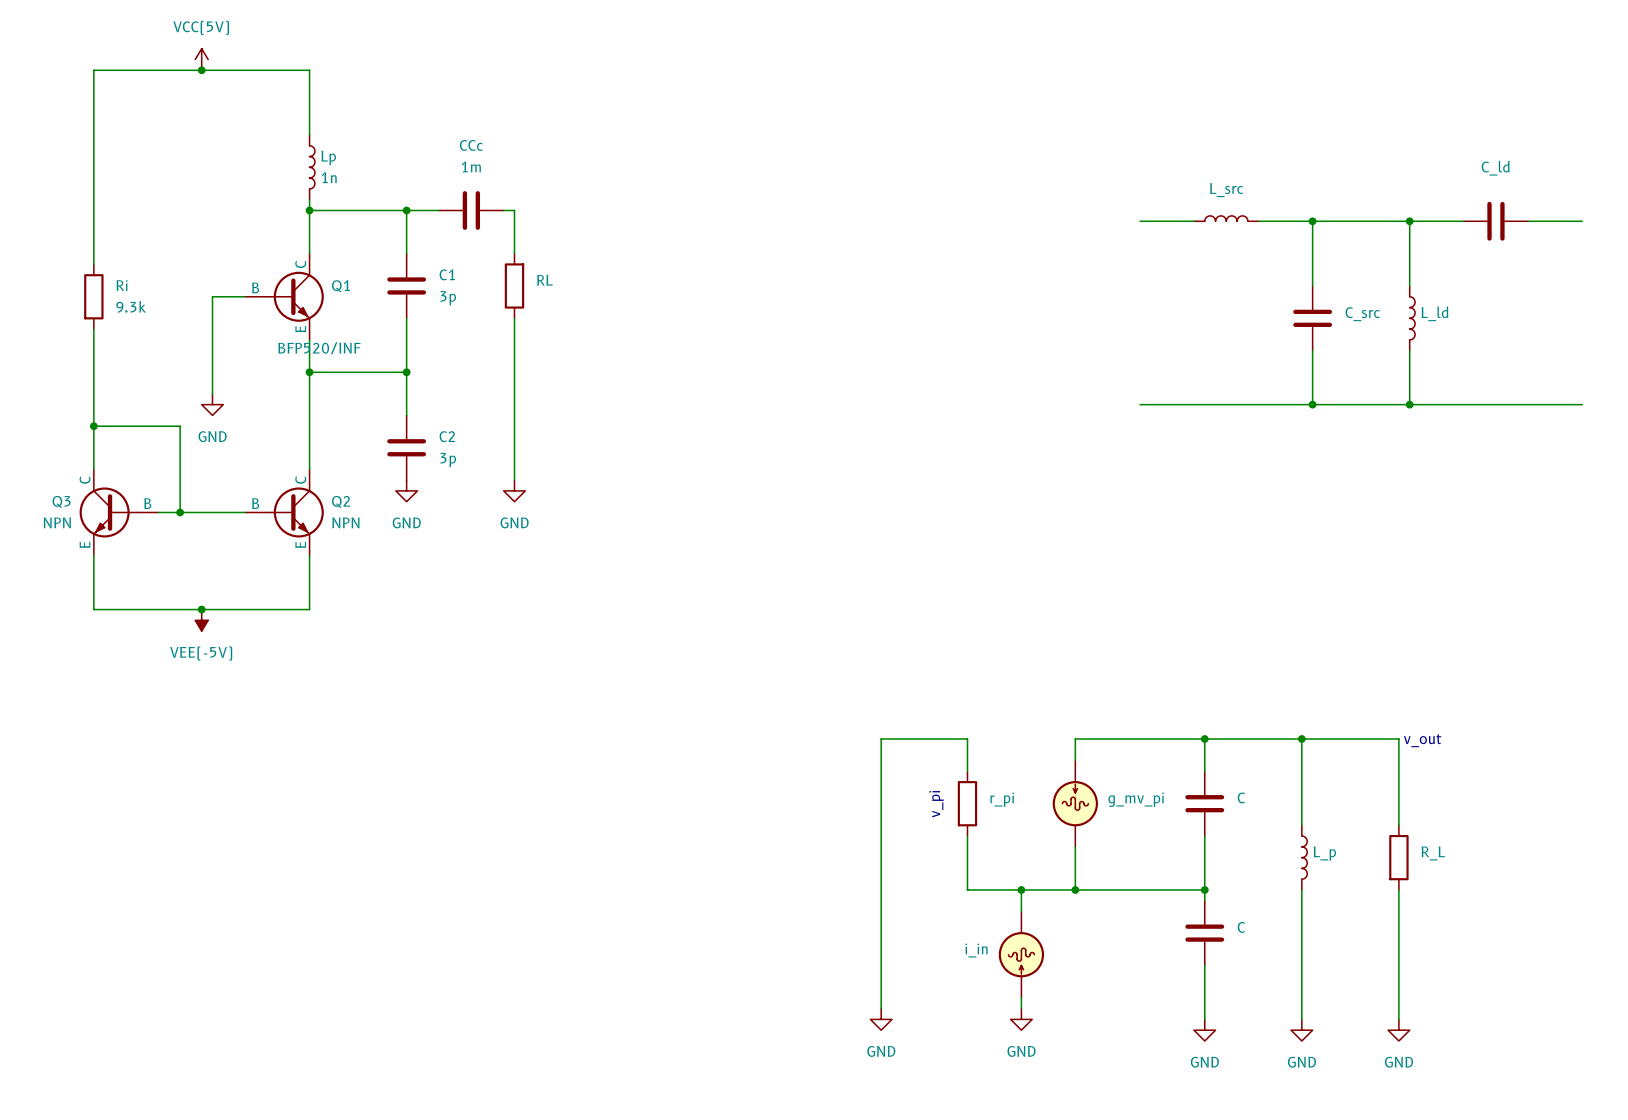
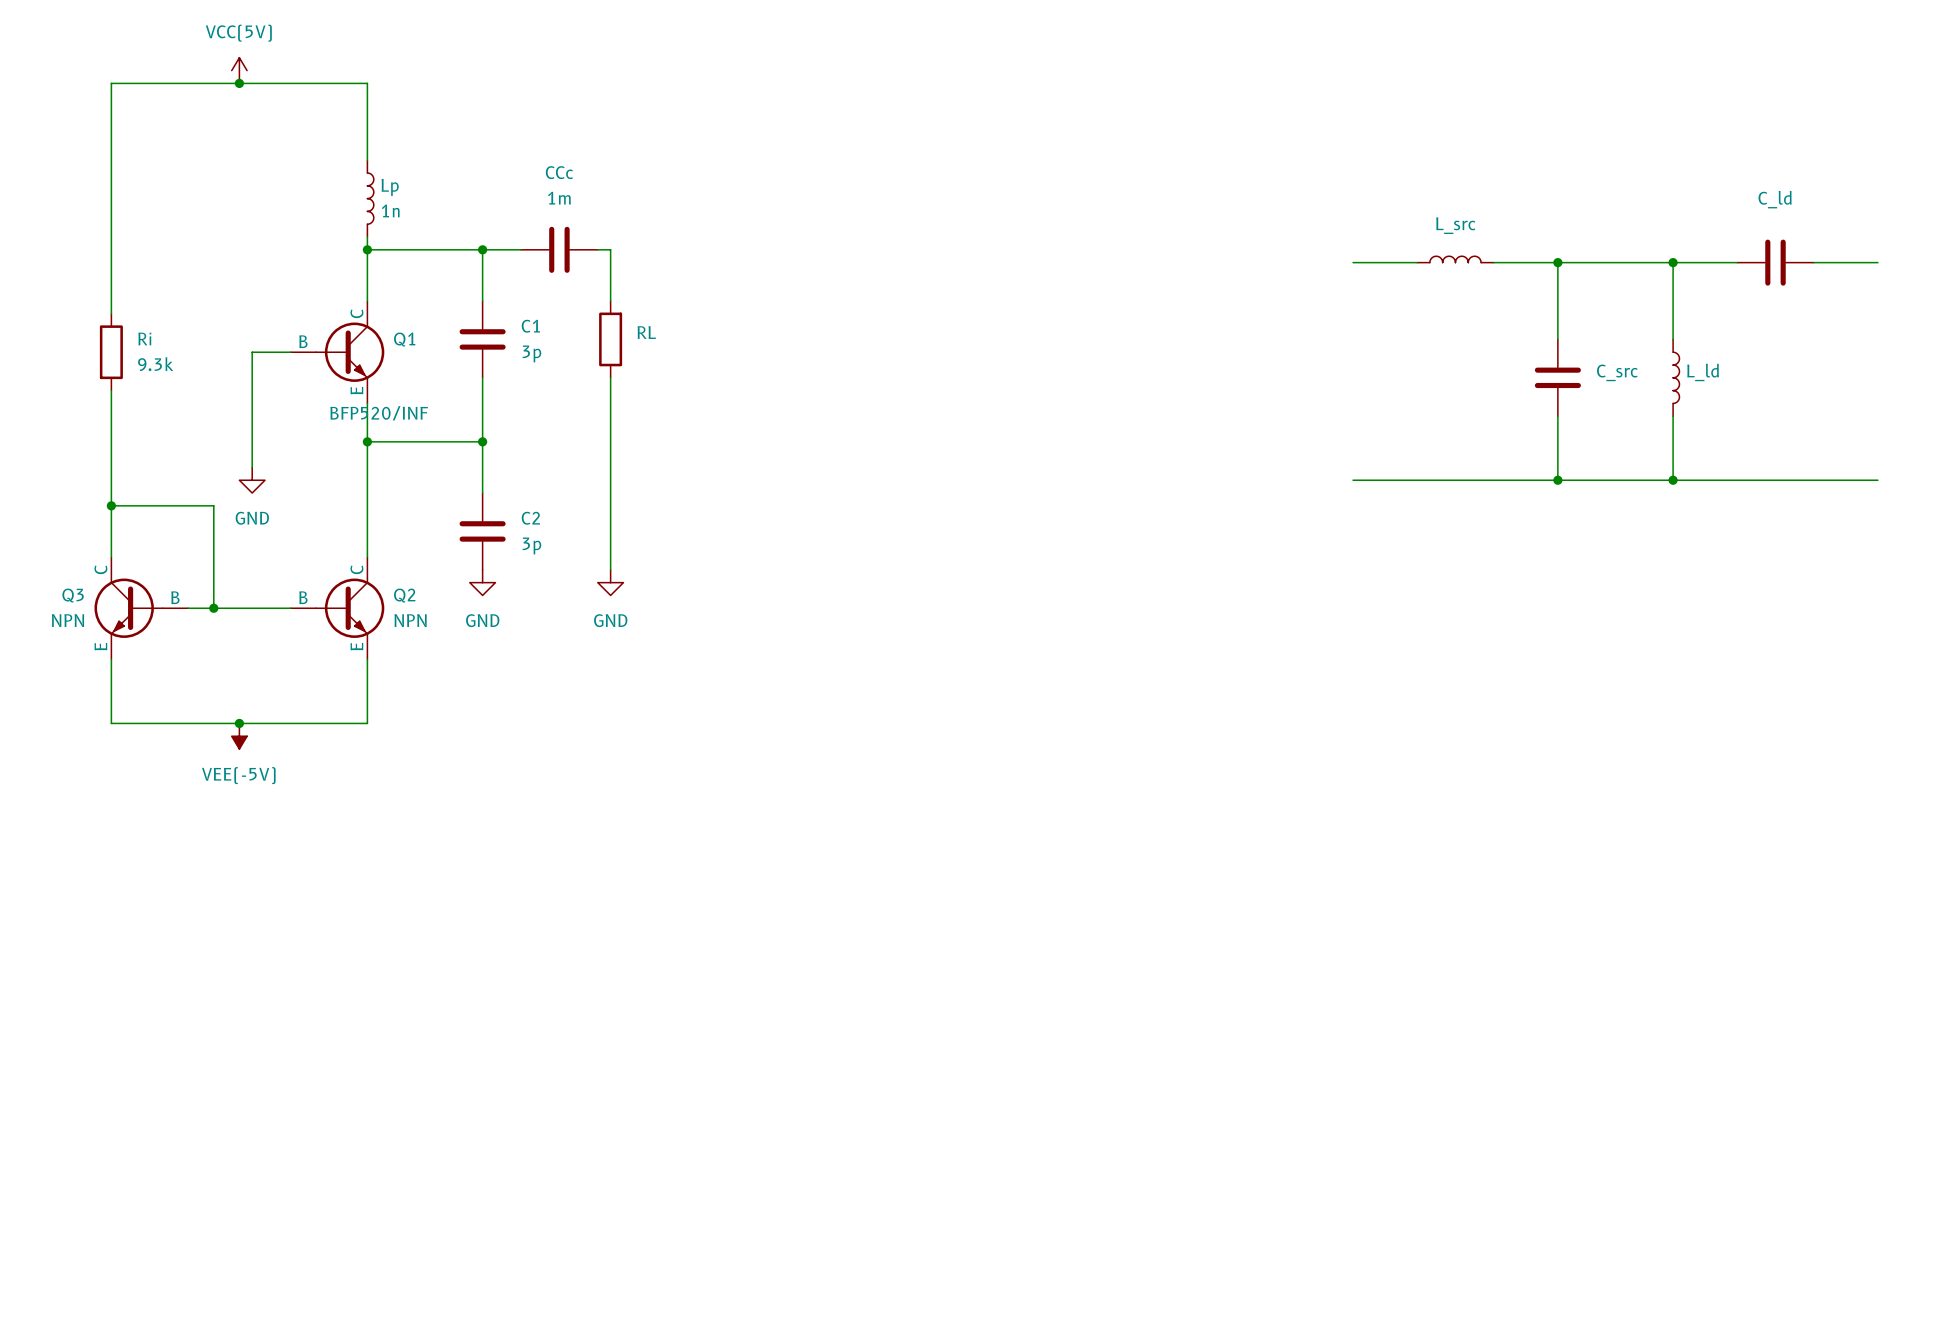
wire: (1204, 738) (1204, 771) -> none
junction: (1204, 738) -> none
wire: (1301, 738) (1301, 825) -> none
junction: (1301, 738) -> none
text: v_out (1422, 740) -> none
wire: (1075, 760) (1075, 738) (1398, 738) (1398, 825) -> none
wire: (967, 771) (967, 738) (881, 738) (881, 1008) -> none
r_pi: (967, 803) -> none
g_mv_pi: (1075, 803) -> none
C: (1204, 803) -> none
text: v_pi (936, 804) -> none
wire: (967, 836) (967, 889) (1204, 889) -> none
wire: (1204, 836) (1204, 900) -> none
wire: (1075, 846) (1075, 889) -> none
L_p: (1304, 857) -> none
R_L: (1398, 857) -> none
wire: (1021, 889) (1021, 911) -> none
junction: (1021, 889) -> none
junction: (1075, 889) -> none
junction: (1204, 889) -> none
wire: (1301, 889) (1301, 1019) -> none
wire: (1398, 889) (1398, 1019) -> none
C: (1204, 933) -> none
i_in: (1021, 954) -> none
wire: (1204, 965) (1204, 1019) -> none
wire: (1021, 997) (1021, 1008) -> none
power symbol: GND (881, 1019) -> none
power symbol: GND (1021, 1019) -> none
power symbol: GND (1204, 1030) -> none
power symbol: GND (1301, 1030) -> none
power symbol: GND (1398, 1030) -> none

